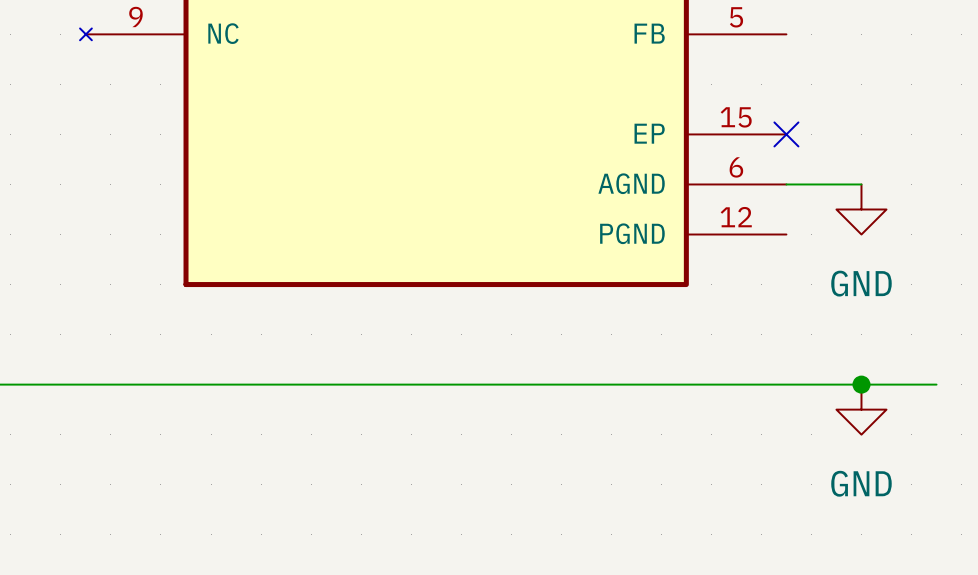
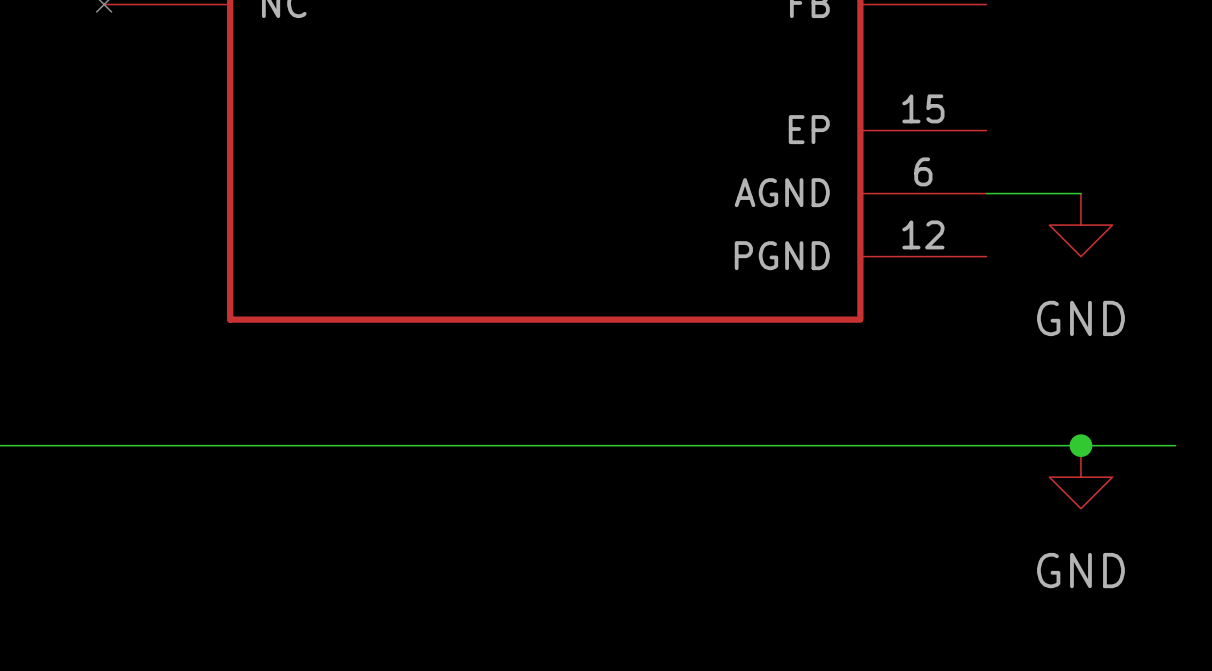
no-connect mark: (786, 134) -> none

